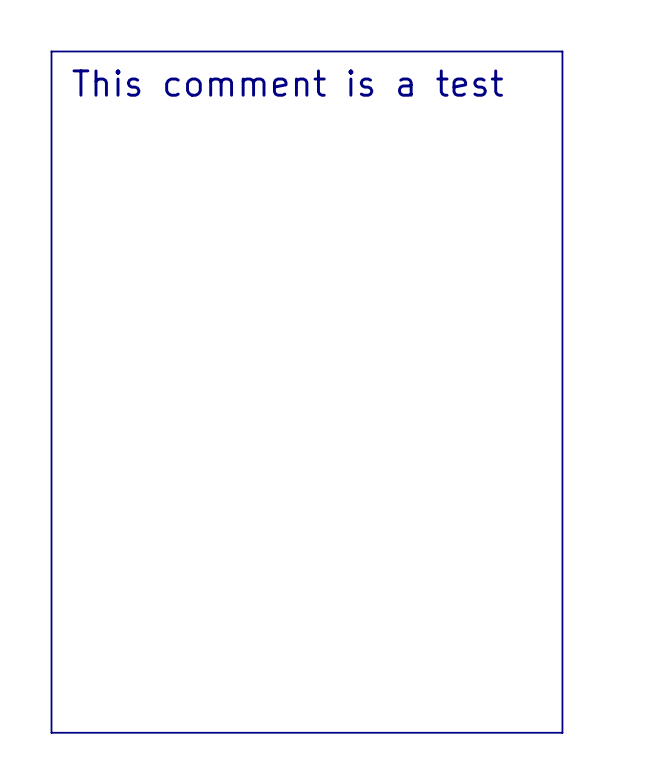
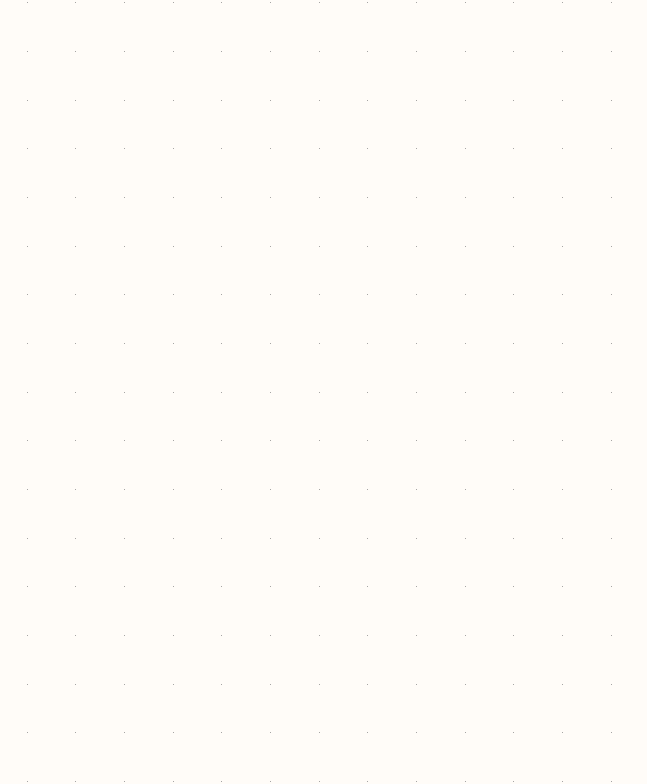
line: (51, 51) (562, 51) (562, 732) (51, 732) (51, 51) -> none
text: This comment is a test (287, 83) -> none

